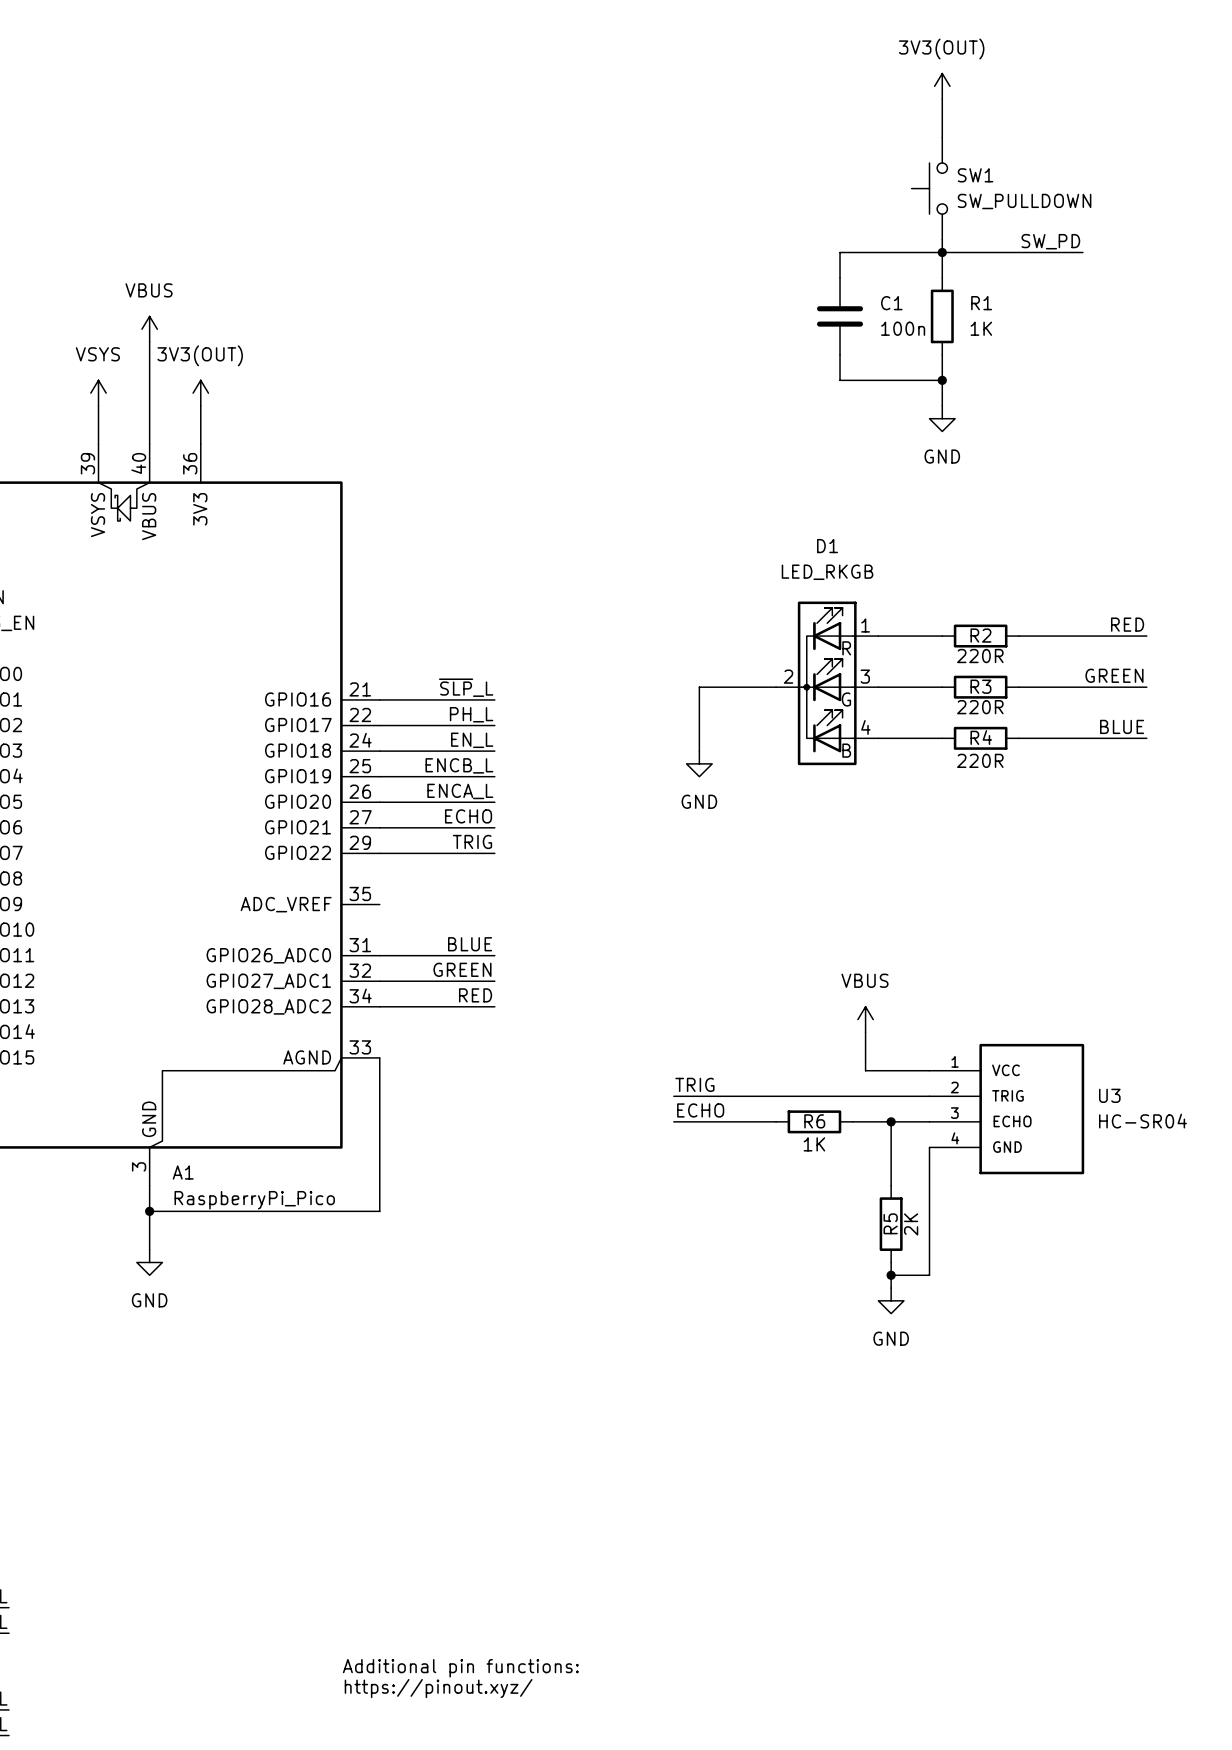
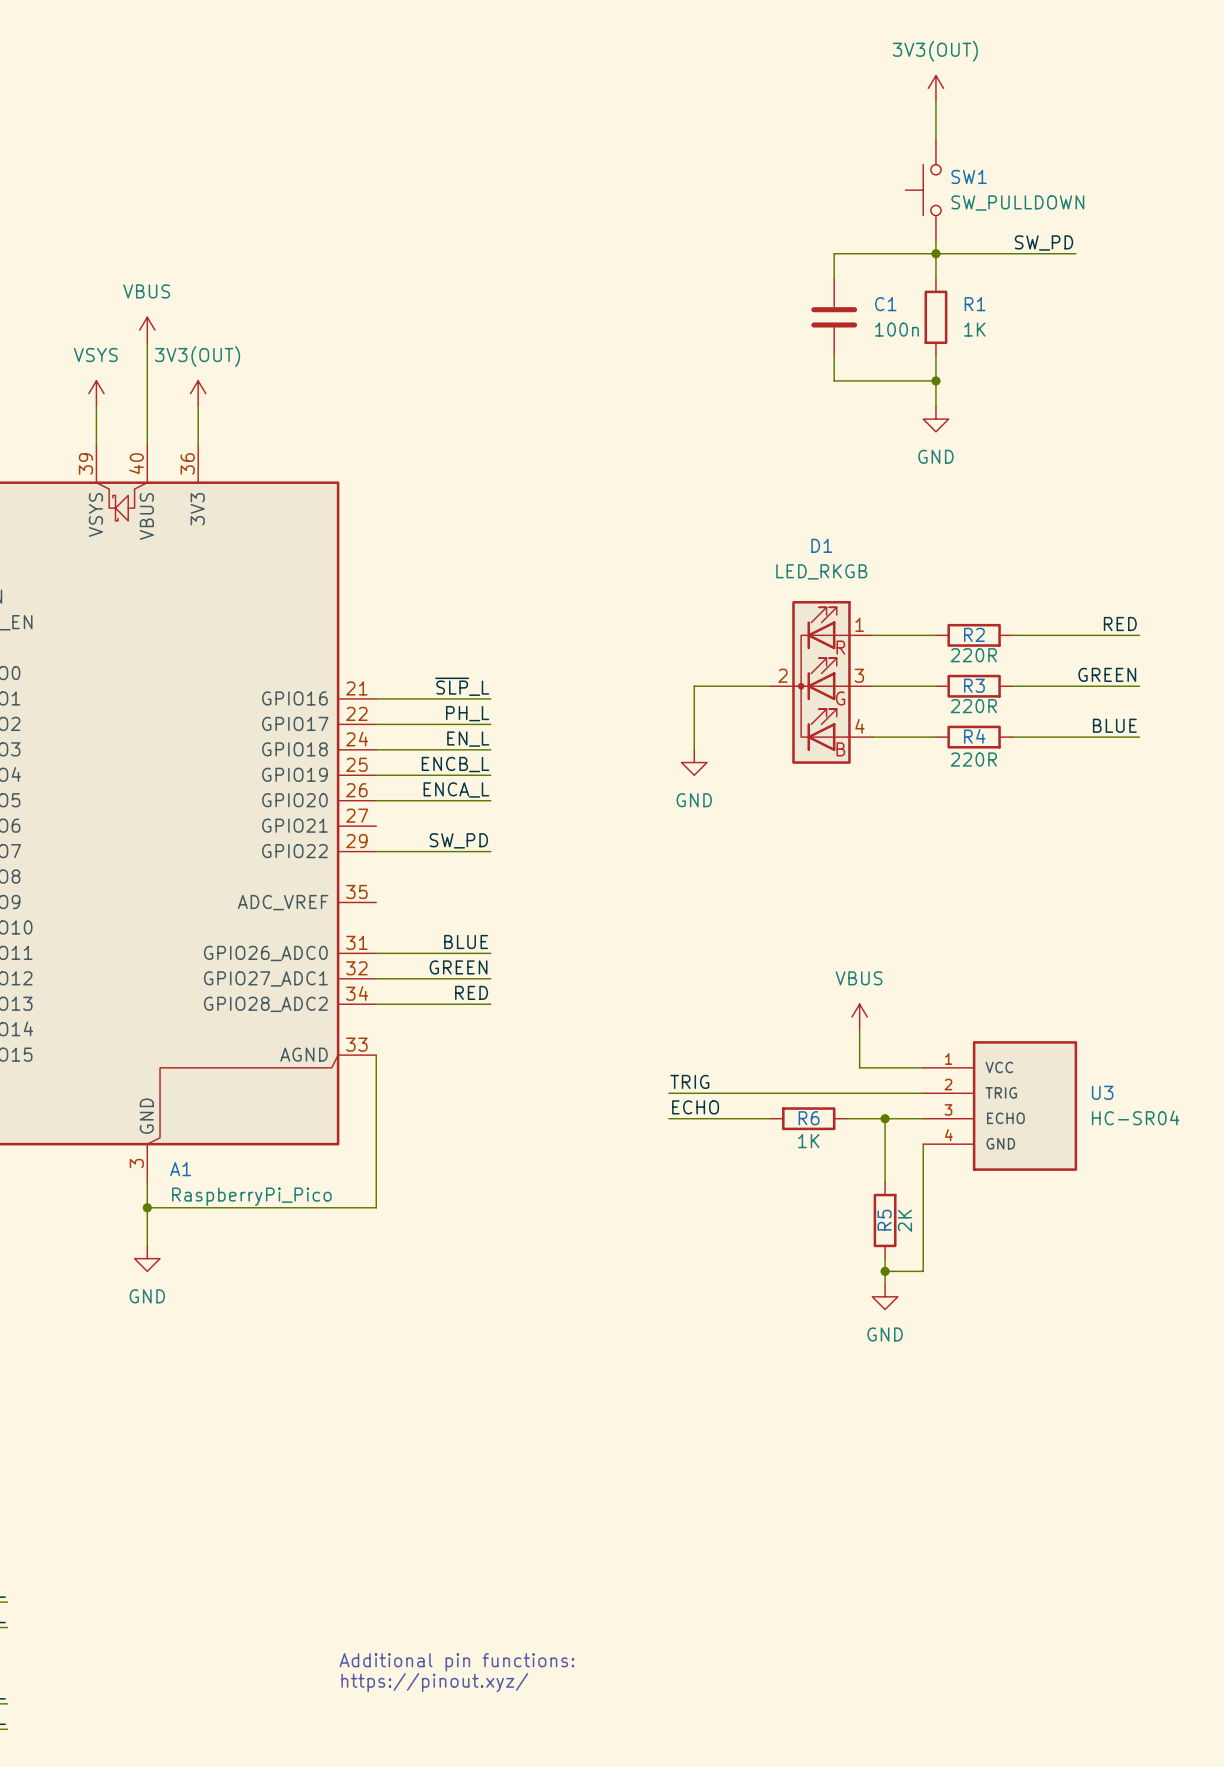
label: ECHO (468, 816) -> none
wire: (379, 827) (494, 827) -> none
label: TRIG (472, 841) -> SW_PD (458, 840)

